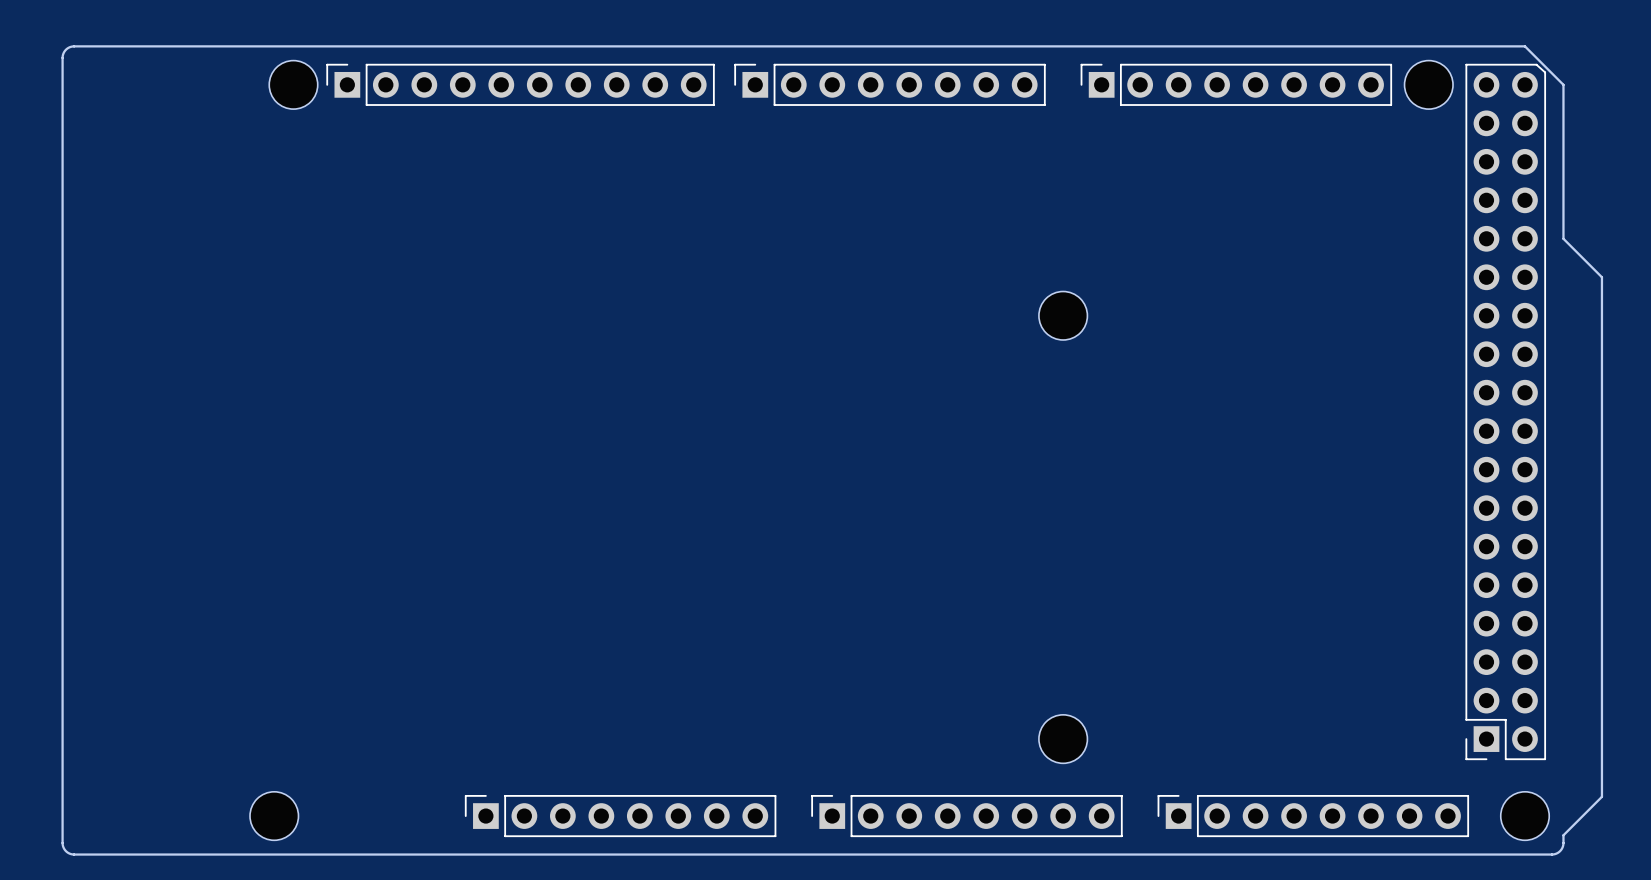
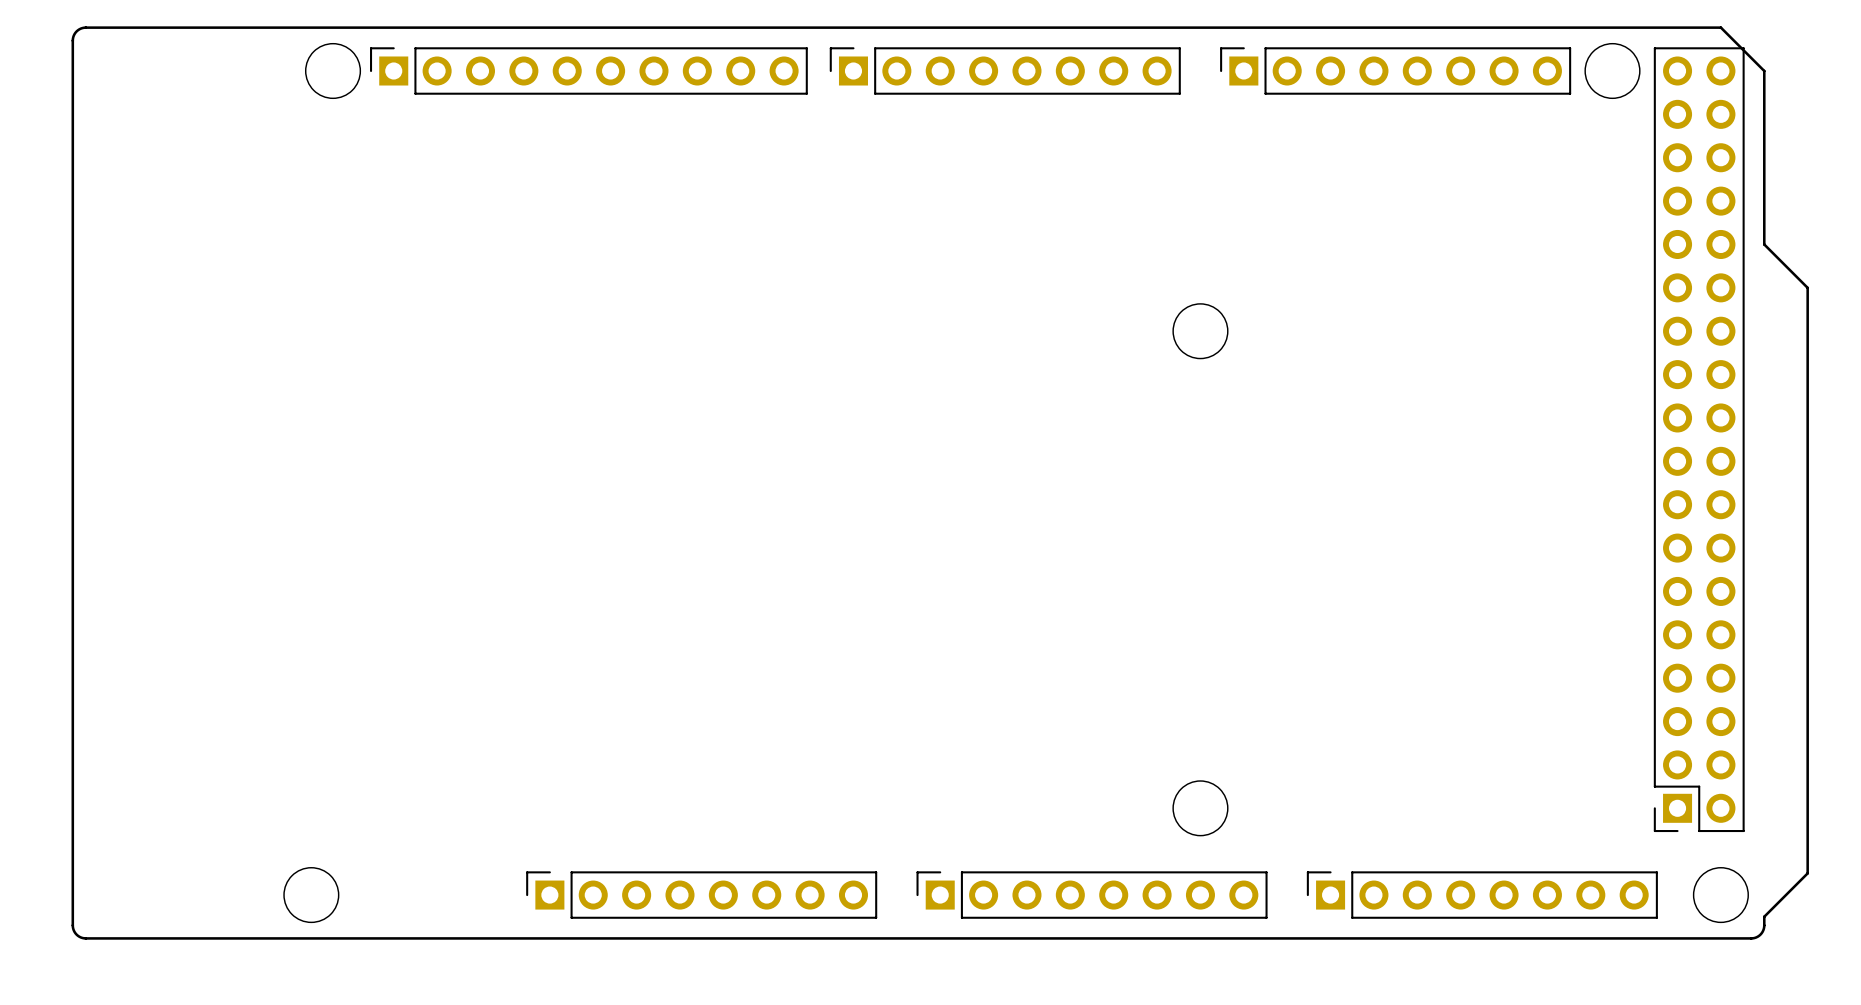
part footprint: [1465, 63, 1547, 761] -> [1653, 47, 1745, 833]

